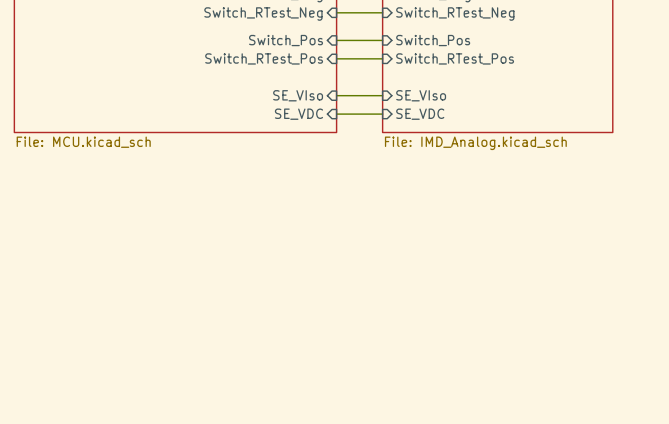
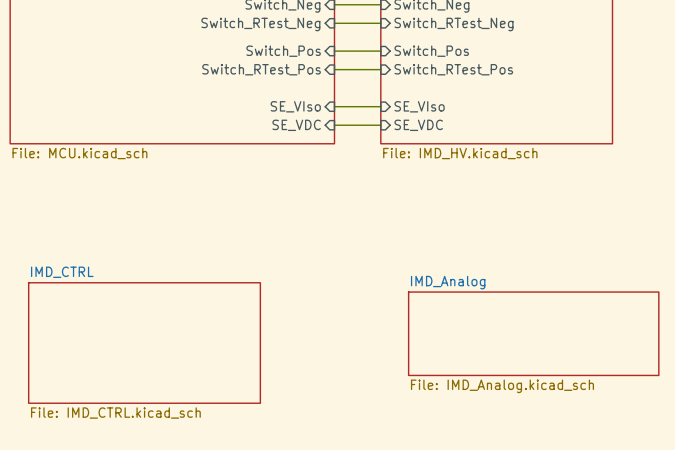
sheet value: File: IMD_Analog.kicad_sch (475, 143) -> File: IMD_HV.kicad_sch (460, 153)
sheet IMD_Analog: none -> File: IMD_Analog.kicad_sch (533, 333)
sheet IMD_CTRL: none -> File: IMD_CTRL.kicad_sch (144, 343)

